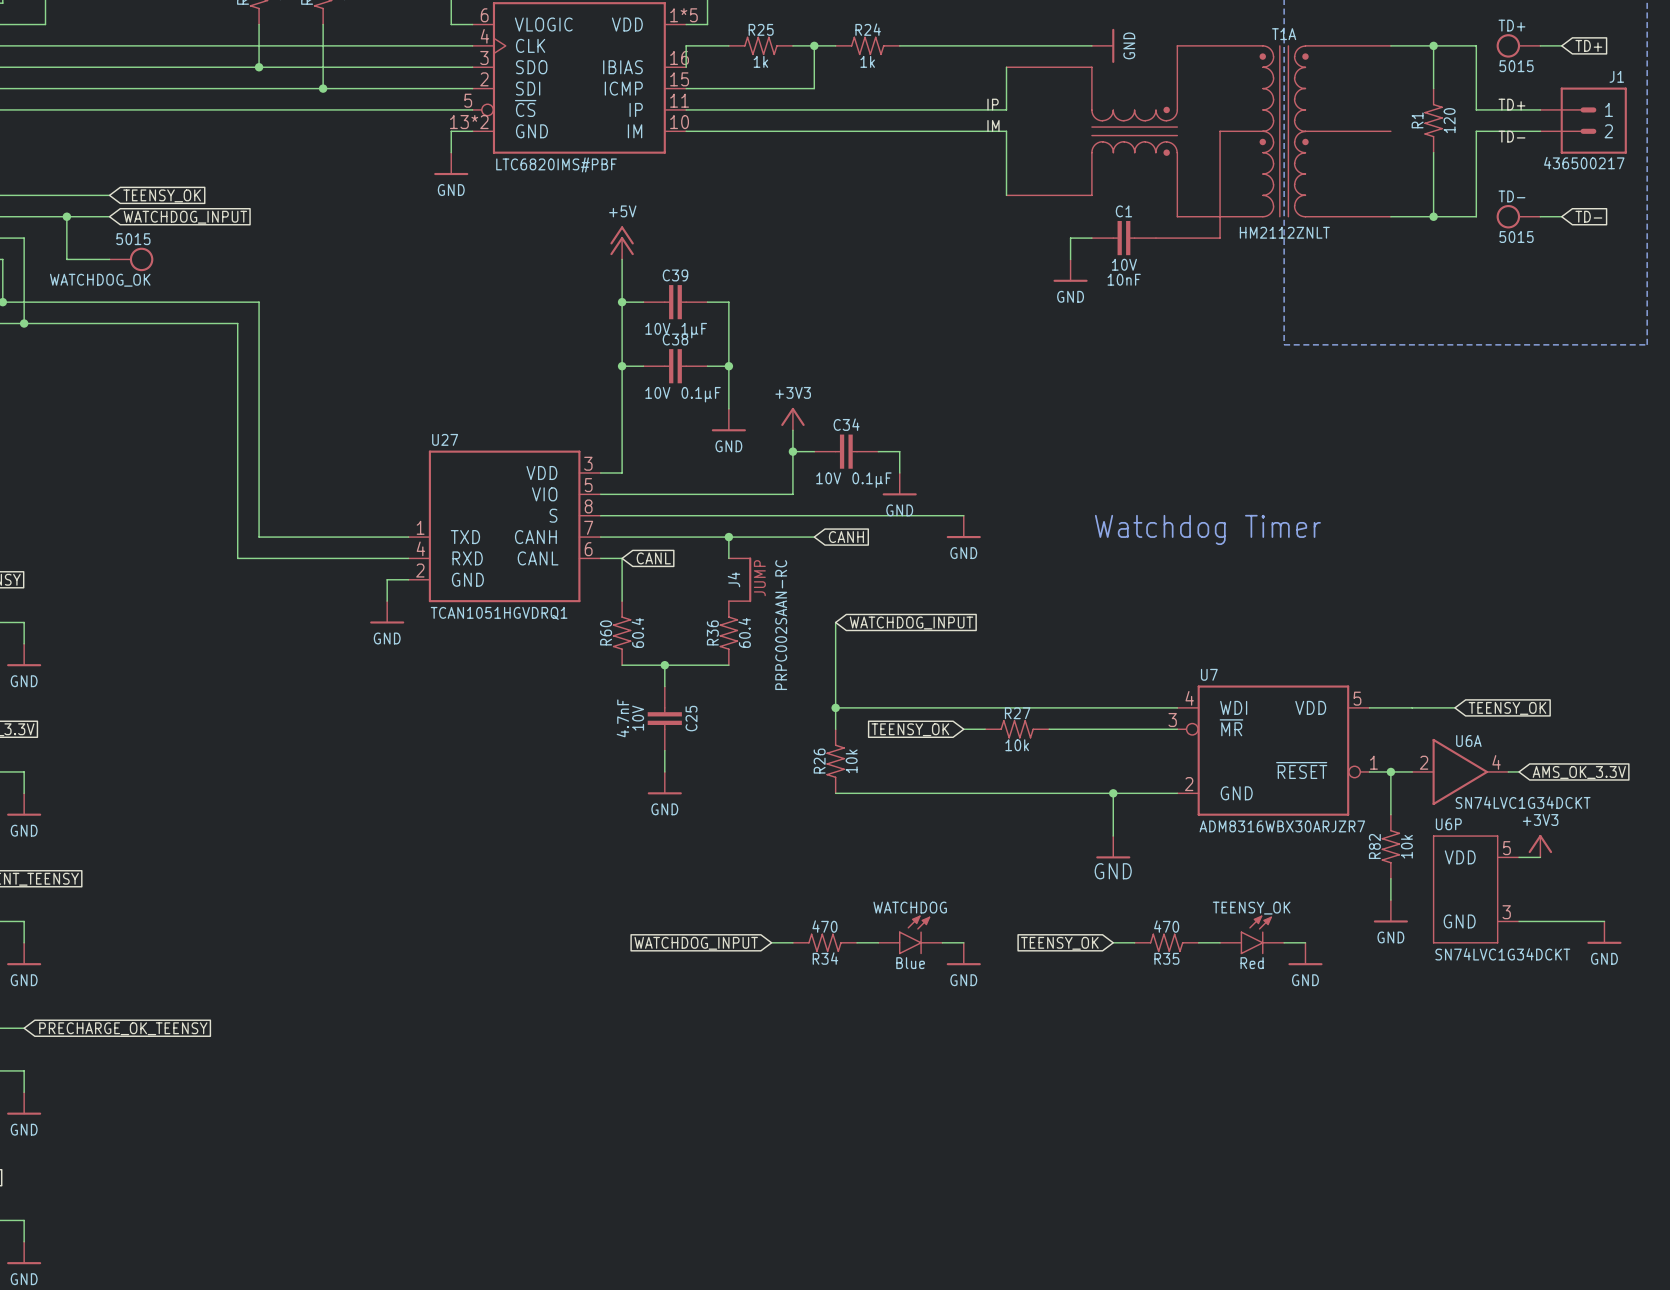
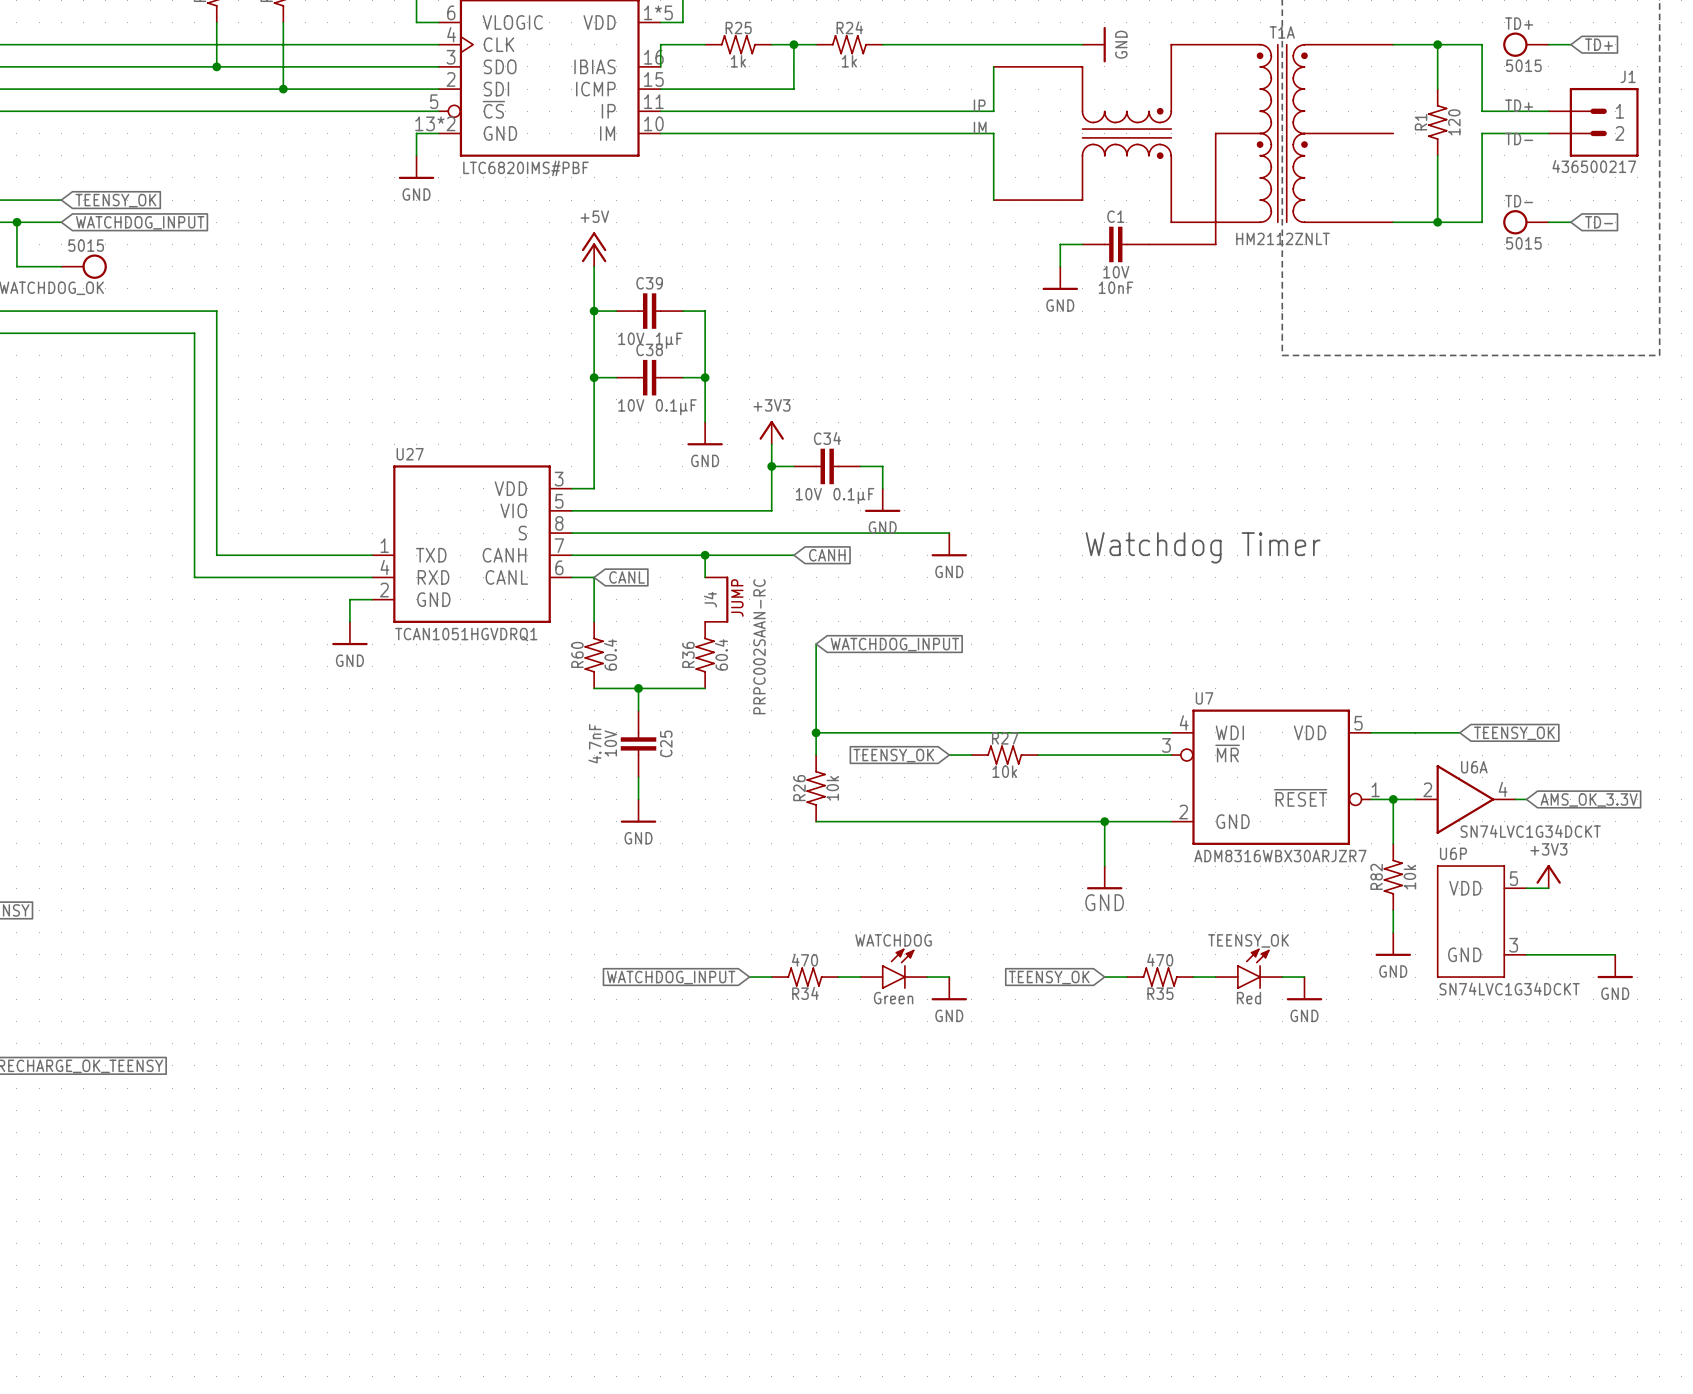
WATCHDOG text: Blue (910, 963) -> Green (893, 998)

